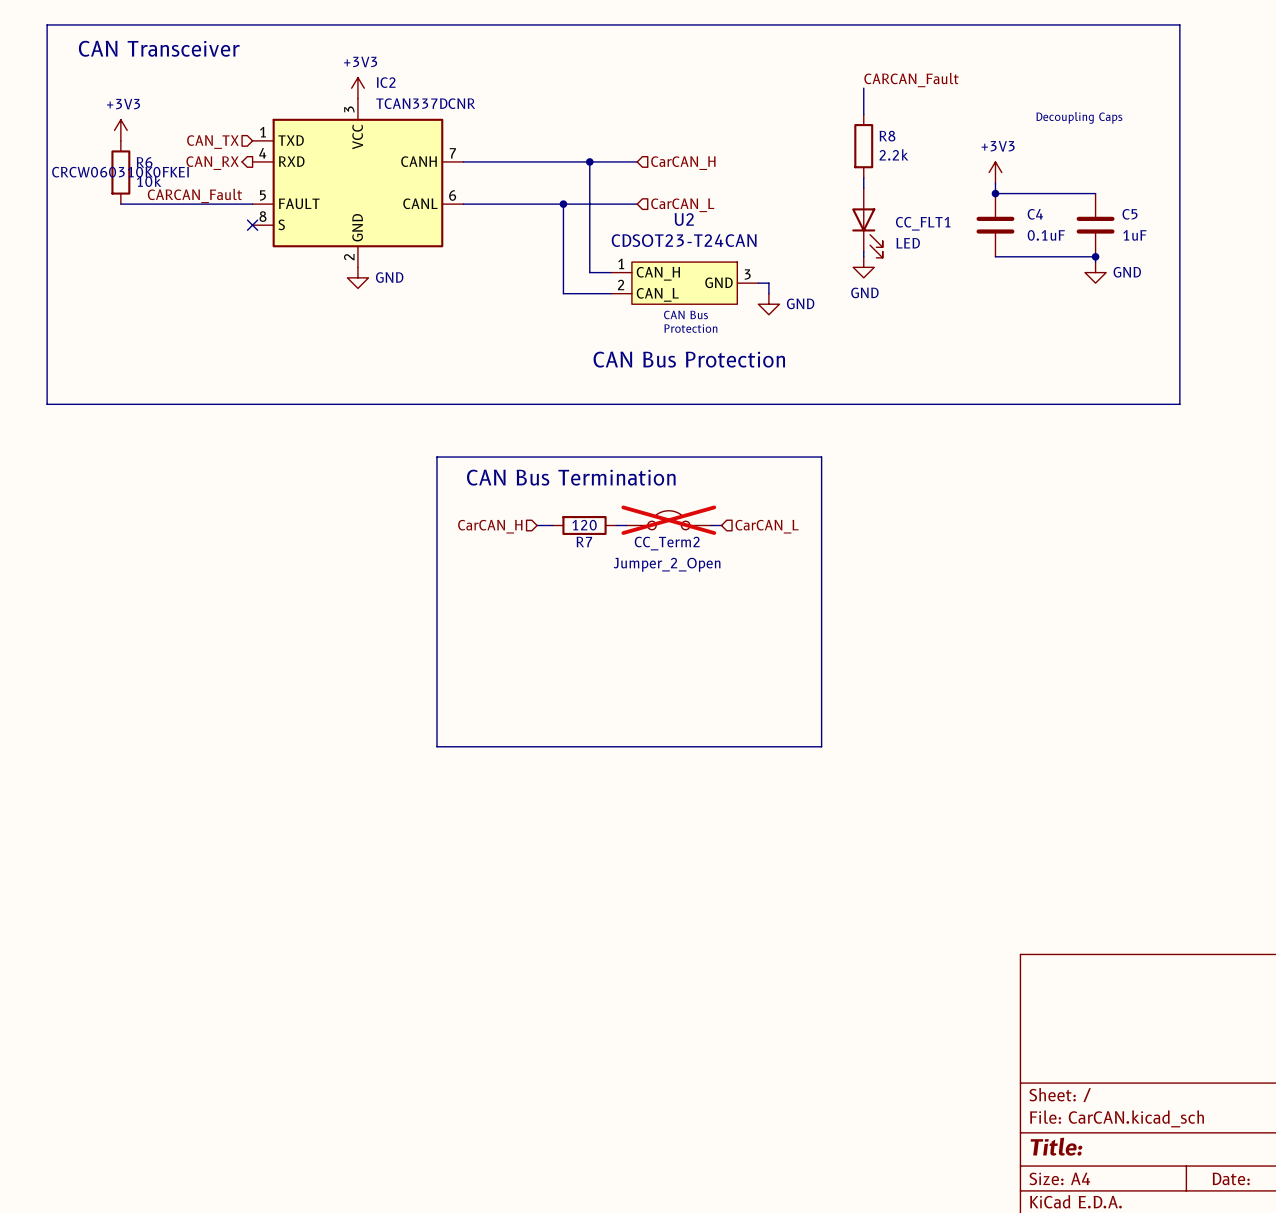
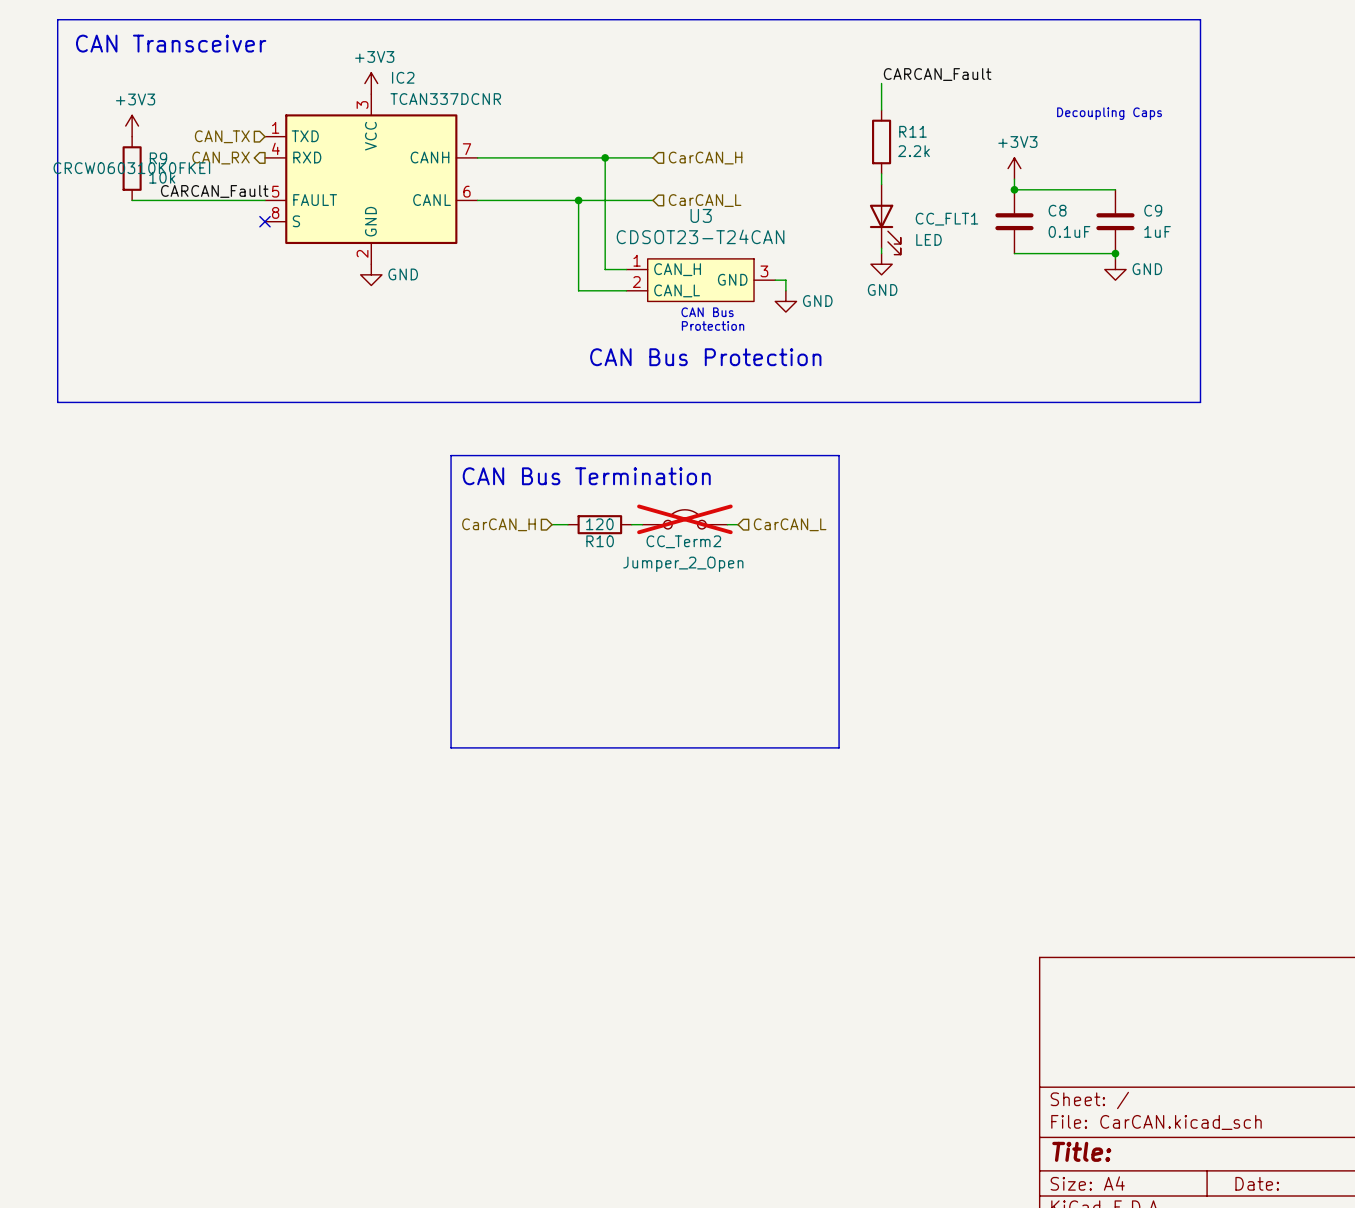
R8 name: R8 (887, 136) -> R11 (912, 131)
R6 name: R6 (144, 162) -> R9 (158, 158)
C4 name: C4 (1035, 214) -> C8 (1057, 210)
C5 name: C5 (1130, 214) -> C9 (1153, 210)
U2 name: U2 (684, 219) -> U3 (701, 215)
R7 name: R7 (584, 541) -> R10 (600, 541)

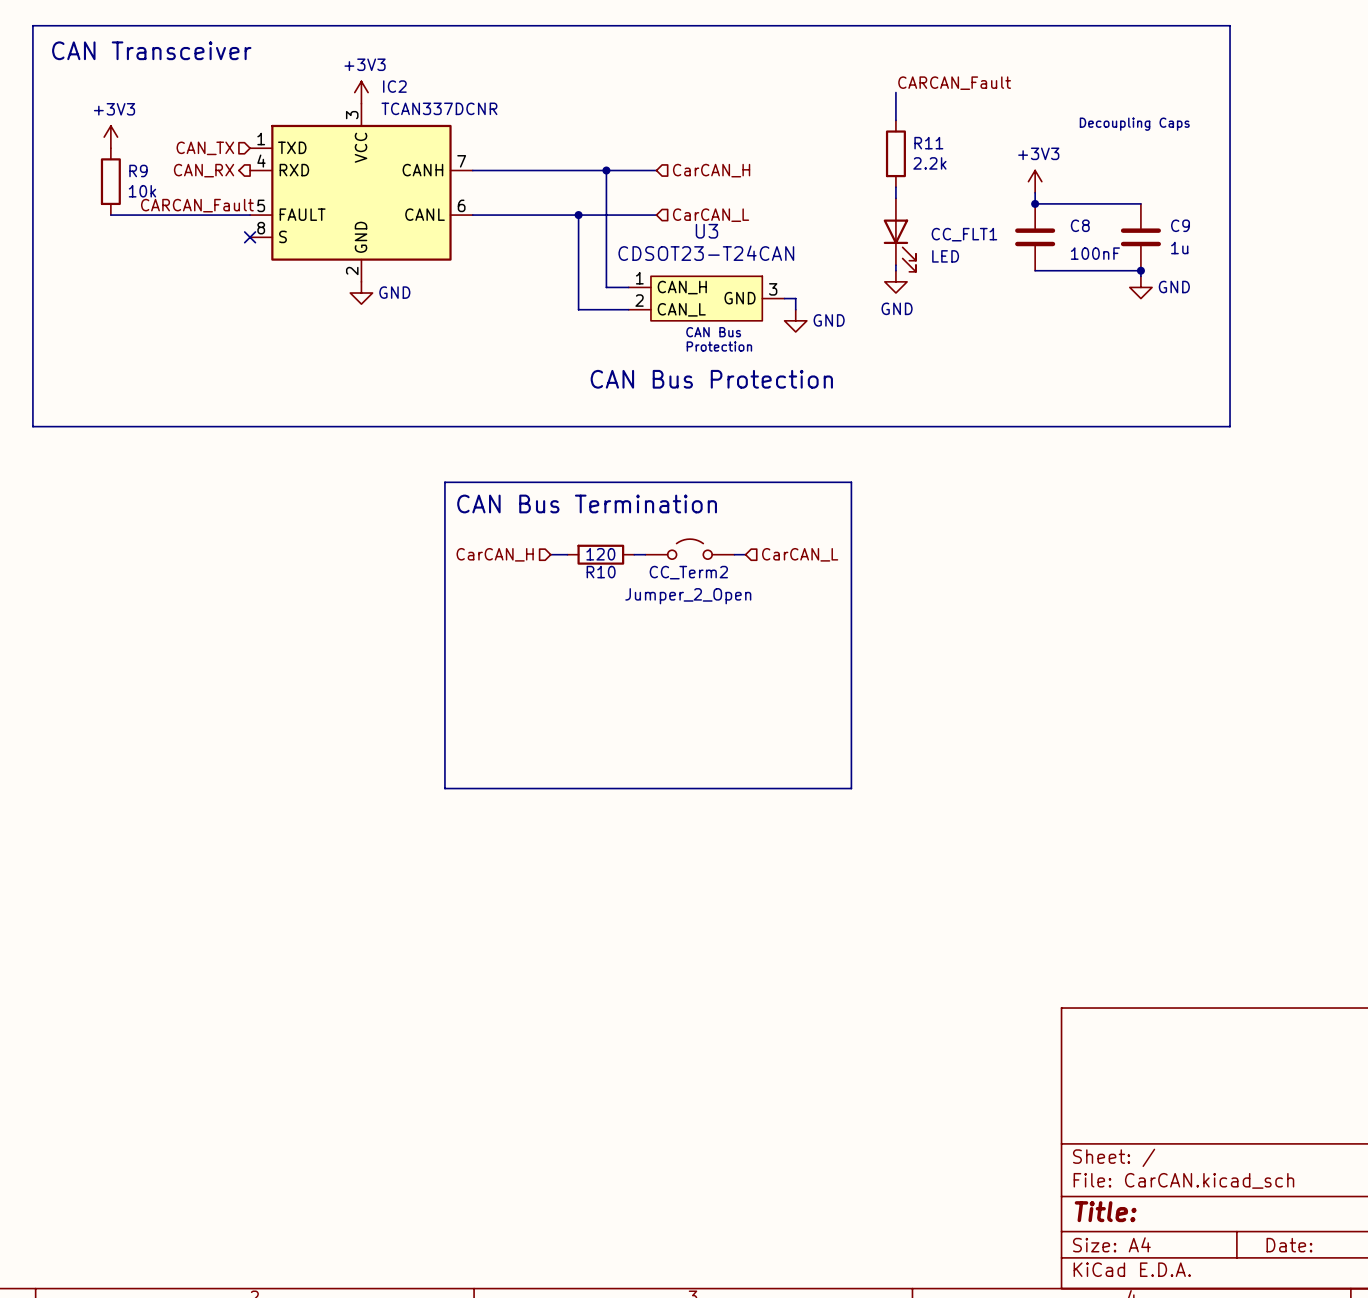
R9 text: CRCW060310K0FKEI (131, 168) -> none
C8 value: 0.1uF (1069, 231) -> 100nF (1095, 253)
C9 value: 1uF (1157, 231) -> 1u (1179, 248)
CC_Term2 do-not-place cross: (684, 519) -> none

